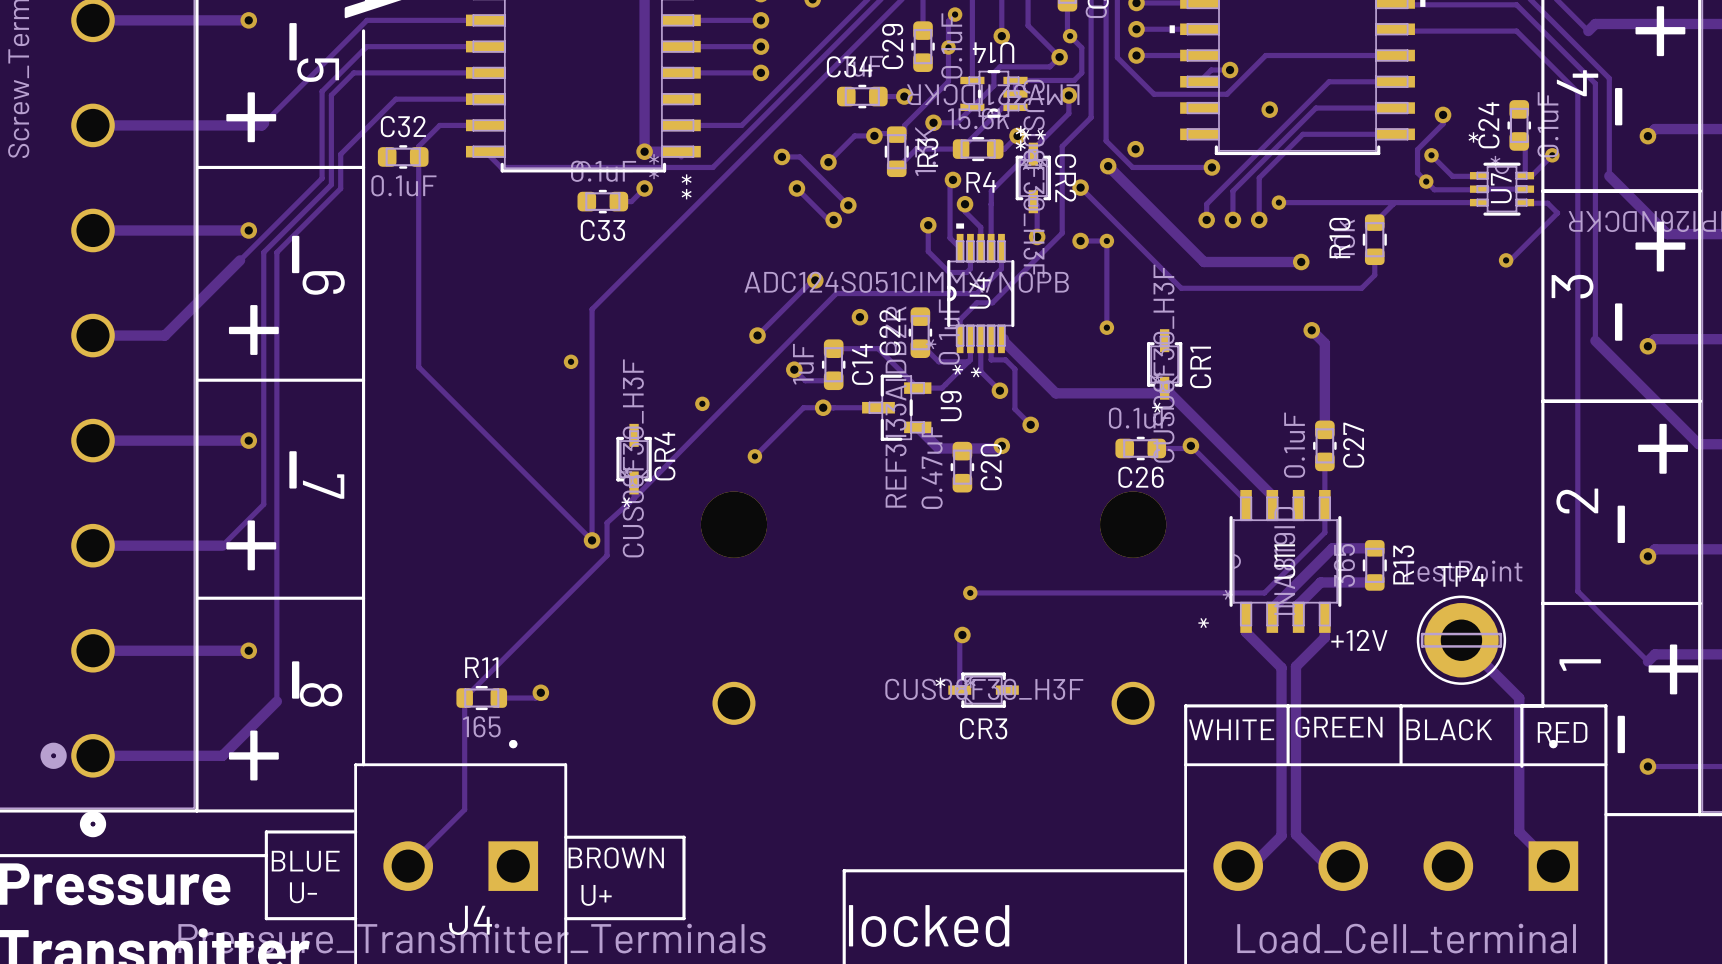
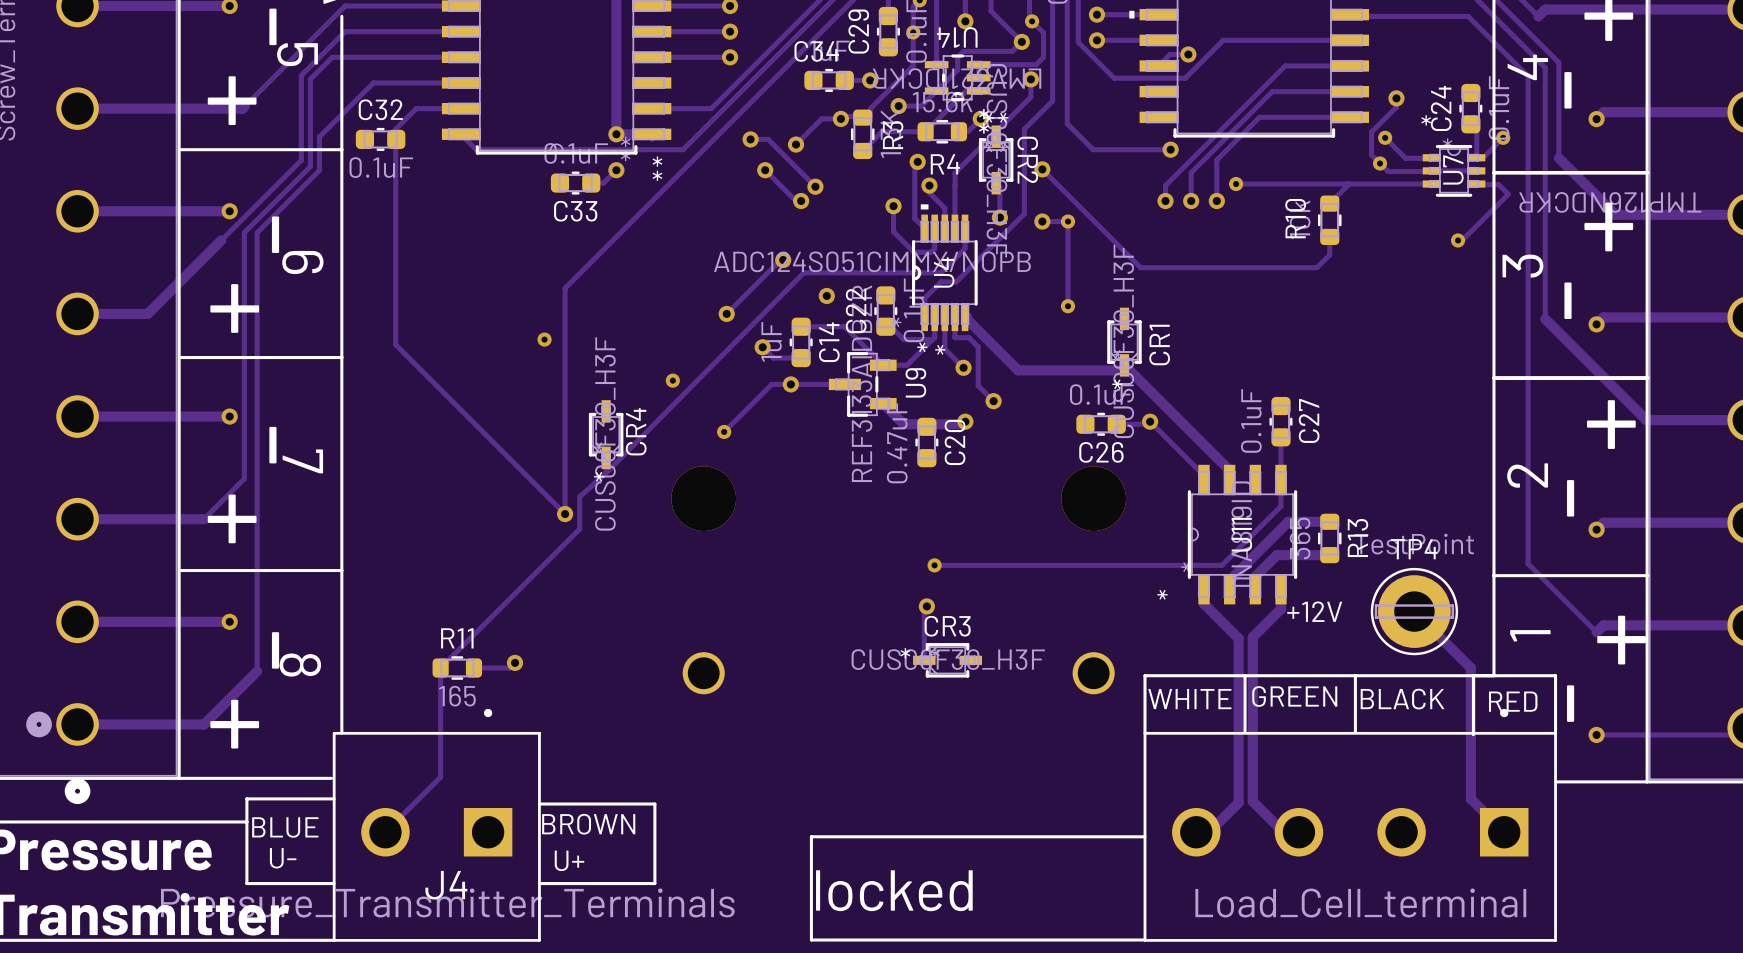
via: (1269, 109) -> none
via: (1135, 149) -> none
track: (1108, 166) (1204, 262) (1301, 262) -> none
via: (1108, 166) -> none
via: (1301, 262) -> none
track: (1311, 330) (1324, 343) (1324, 429) -> none
via: (1311, 330) -> none
CR3 name position: CR3 (983, 728) -> CR3 (947, 626)

